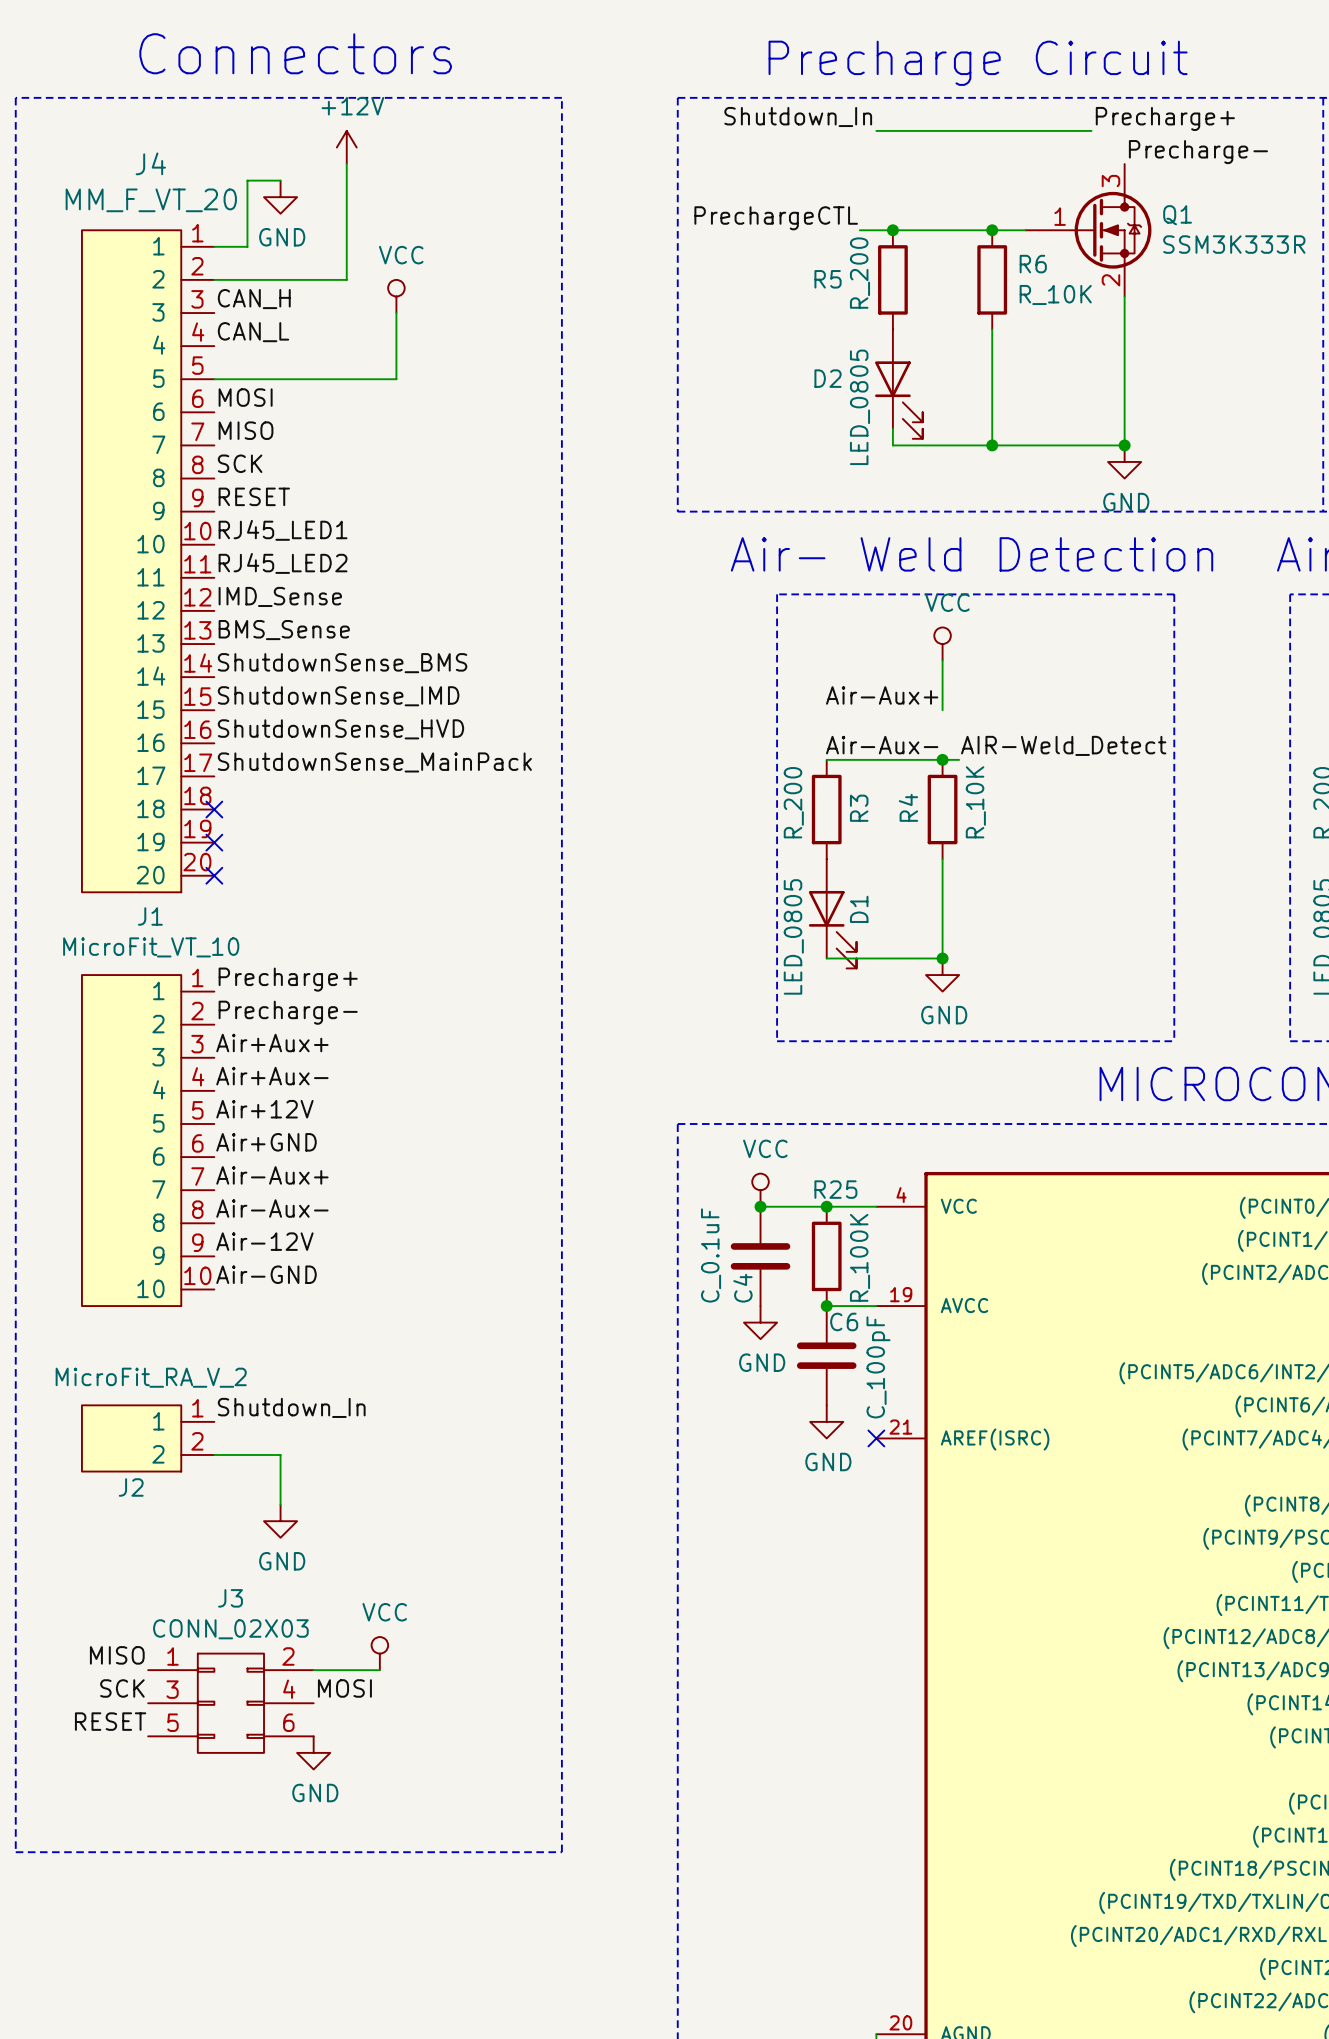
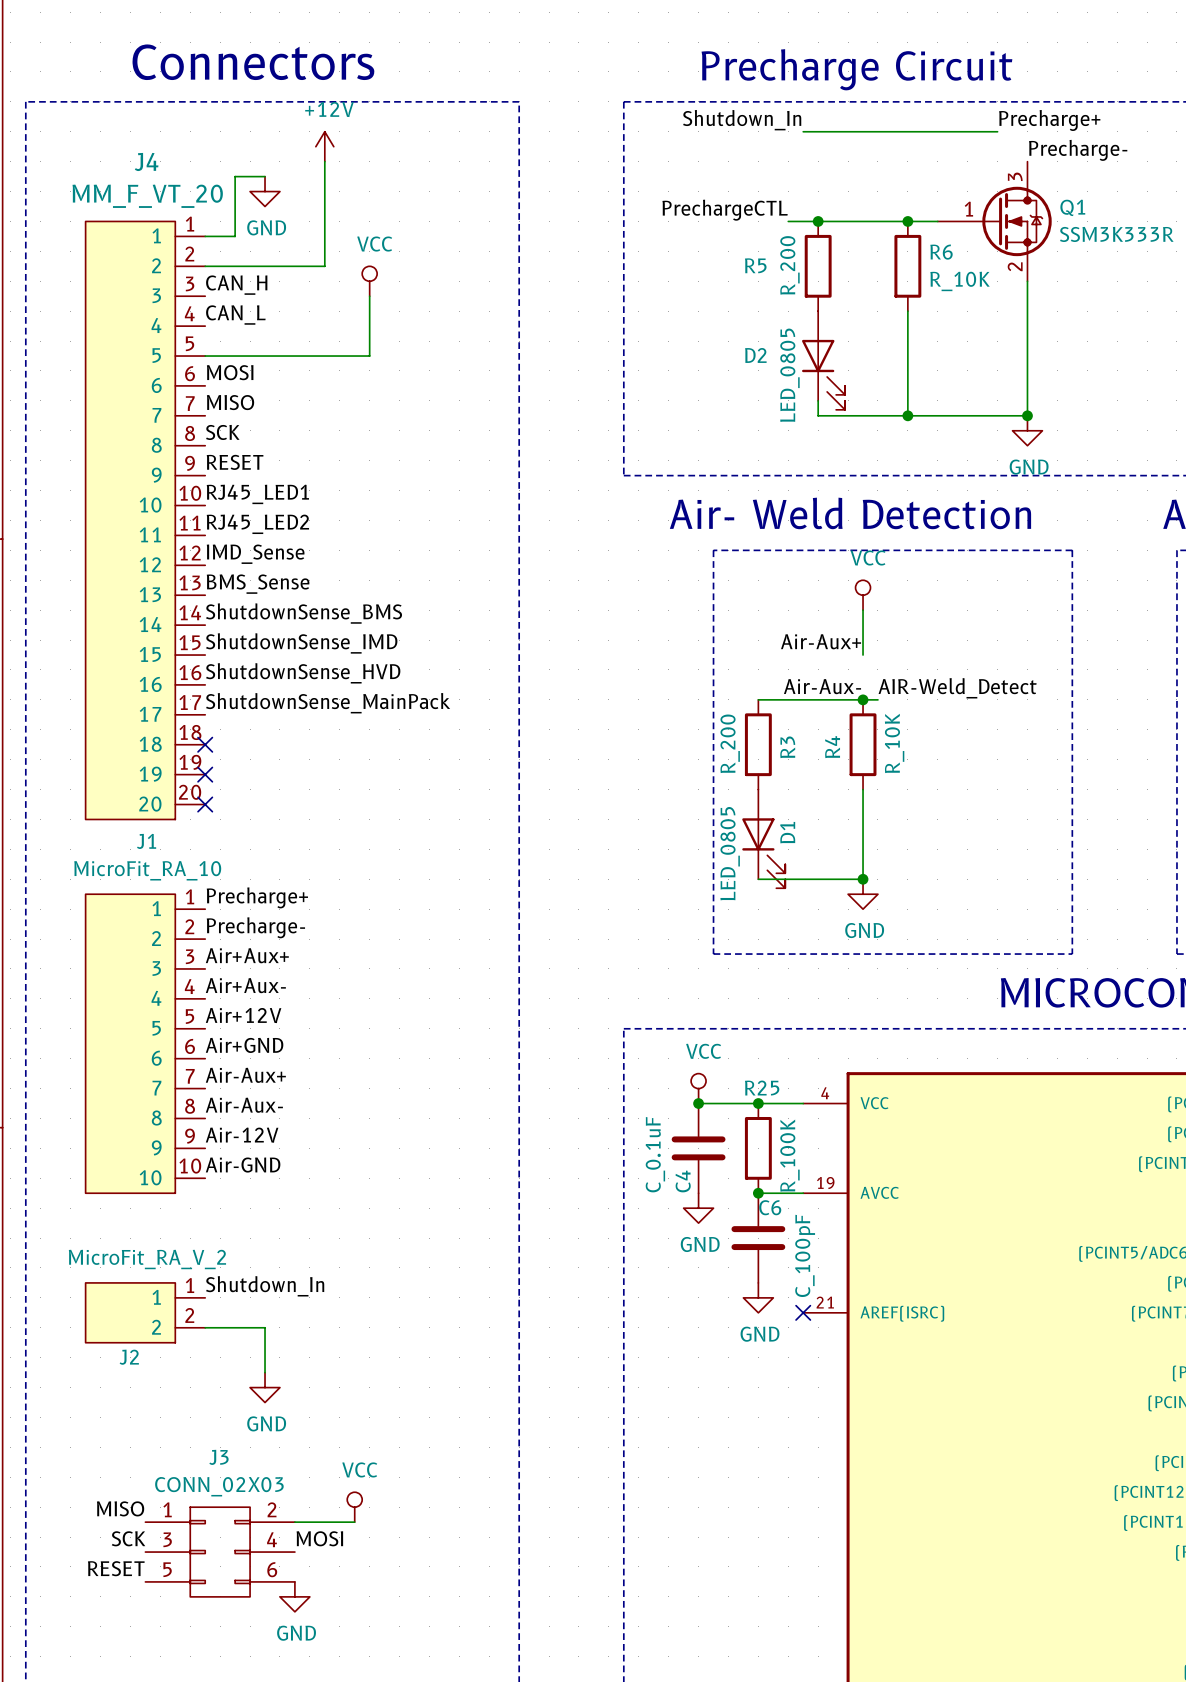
J1 value: MicroFit_VT_10 (151, 947) -> MicroFit_RA_10 (147, 870)

